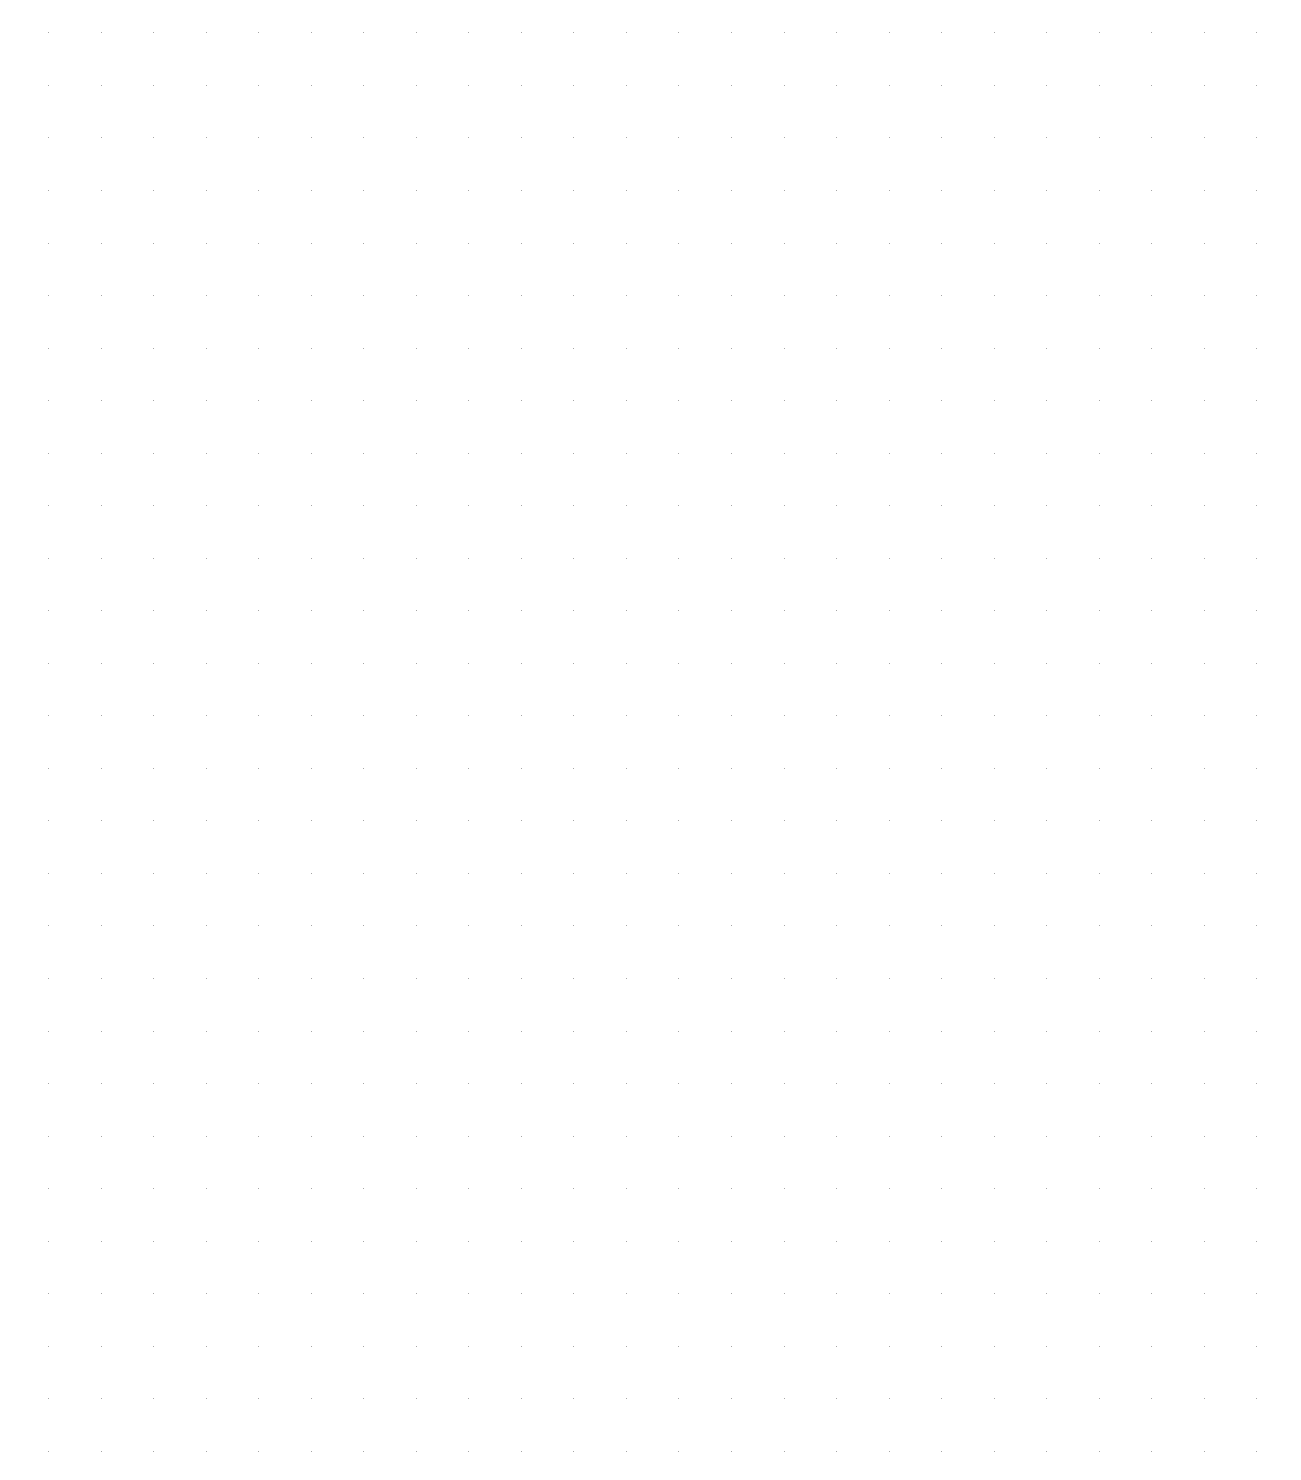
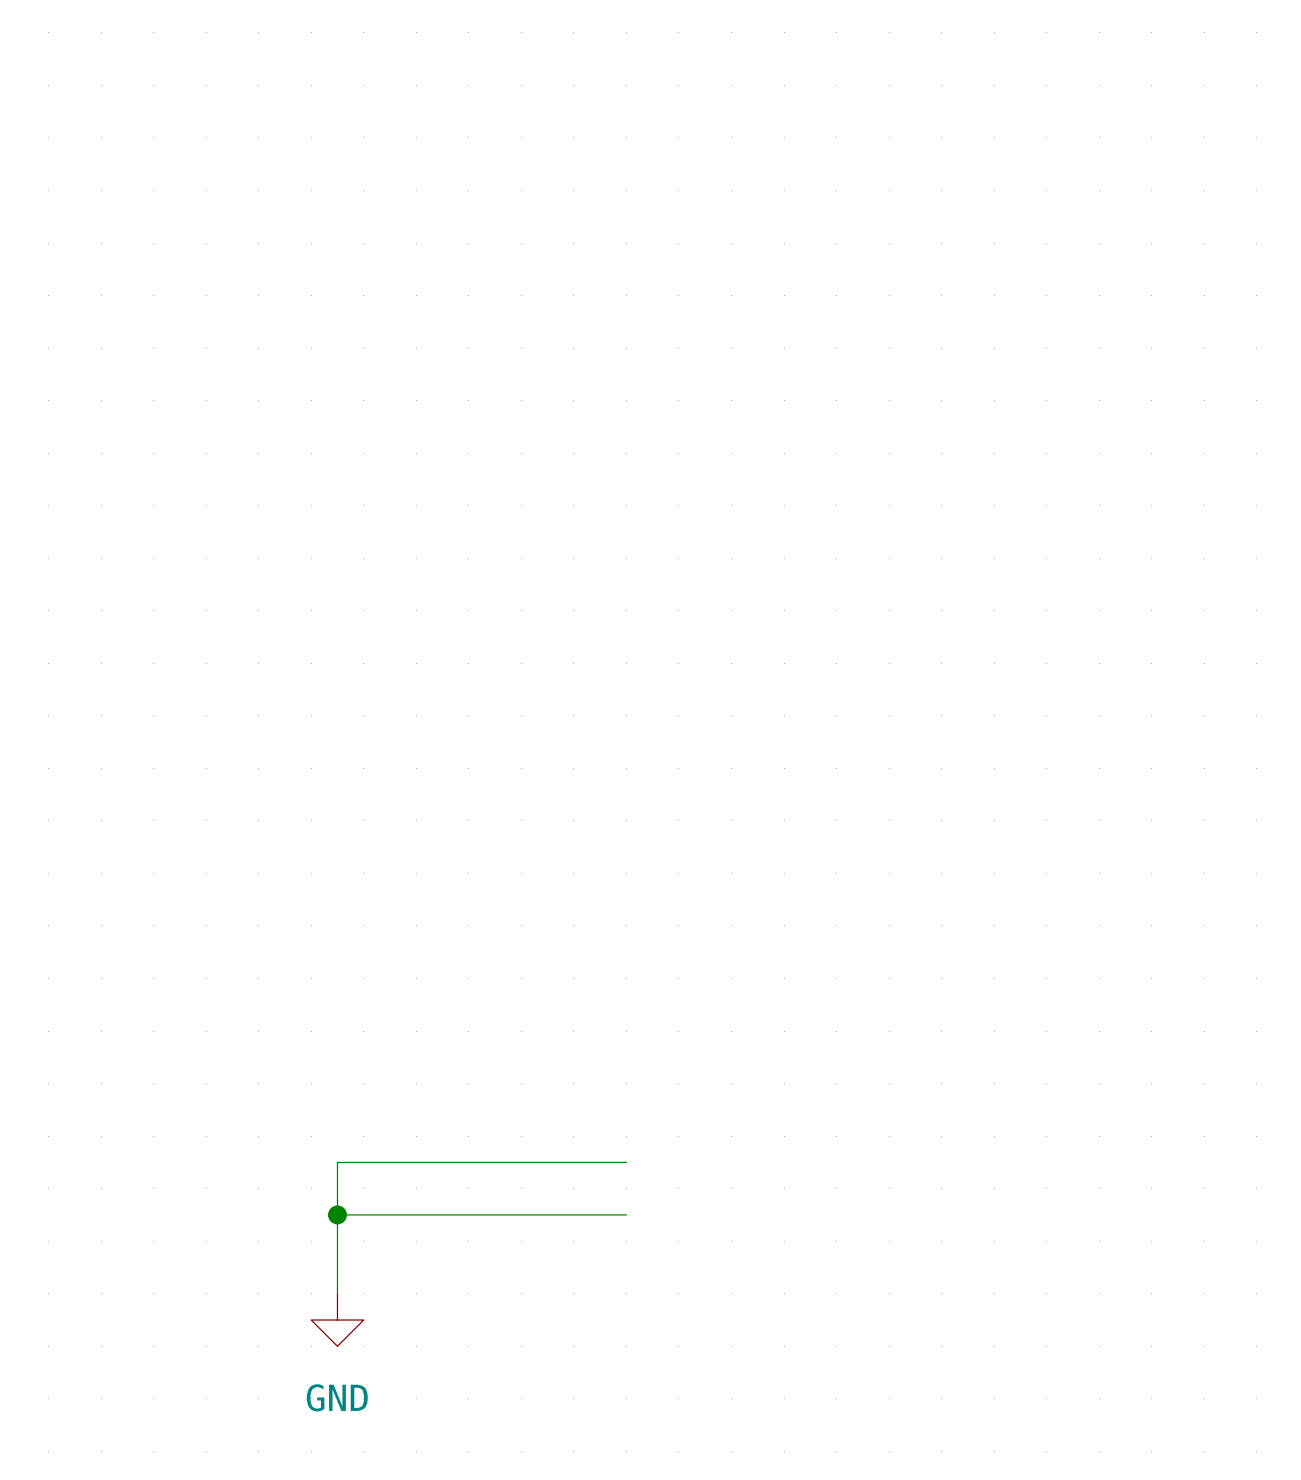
wire: none -> (626, 1162) (337, 1162) (337, 1293)
wire: none -> (337, 1214) (626, 1214)
junction: none -> (337, 1214)
power symbol: none -> GND (337, 1320)

